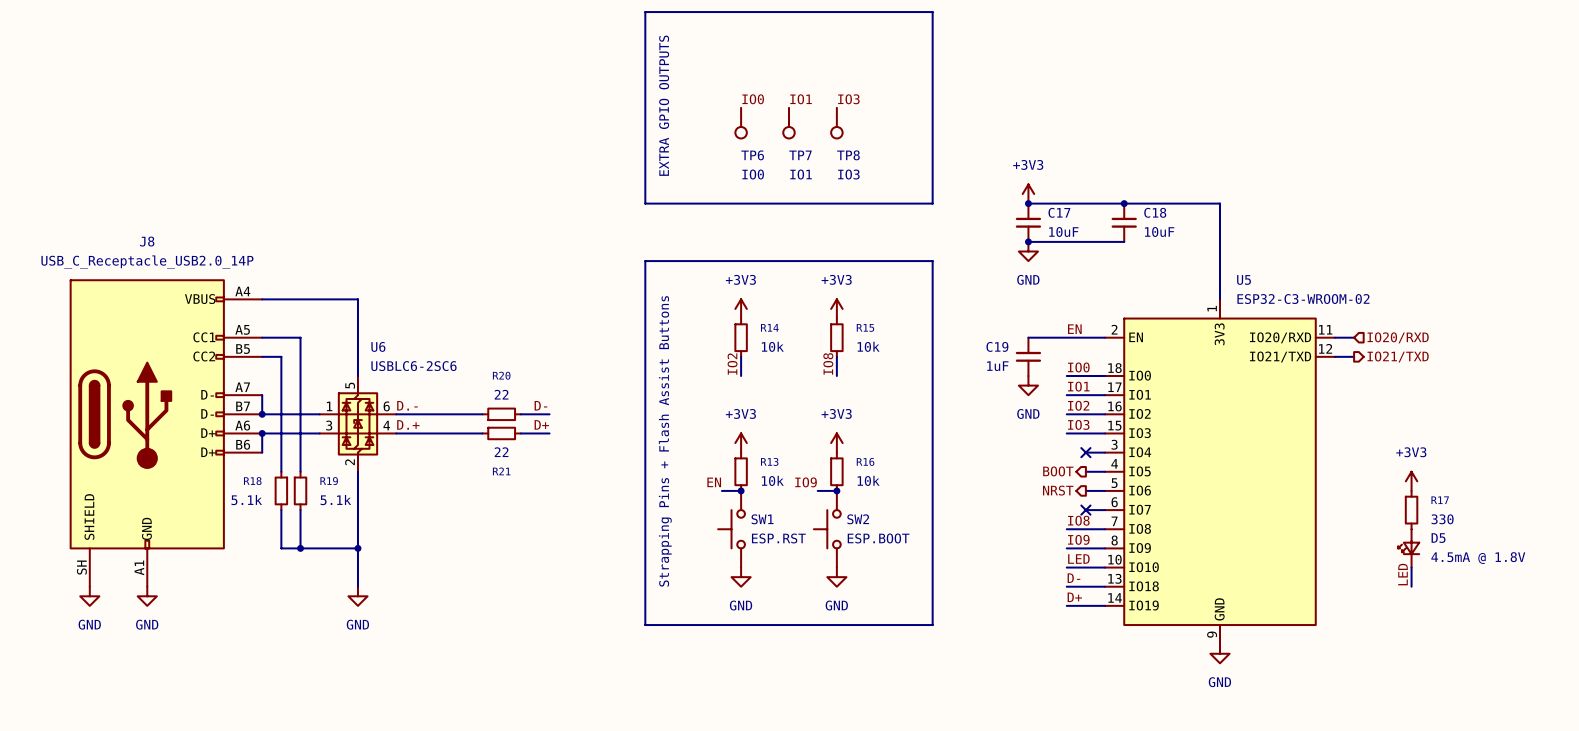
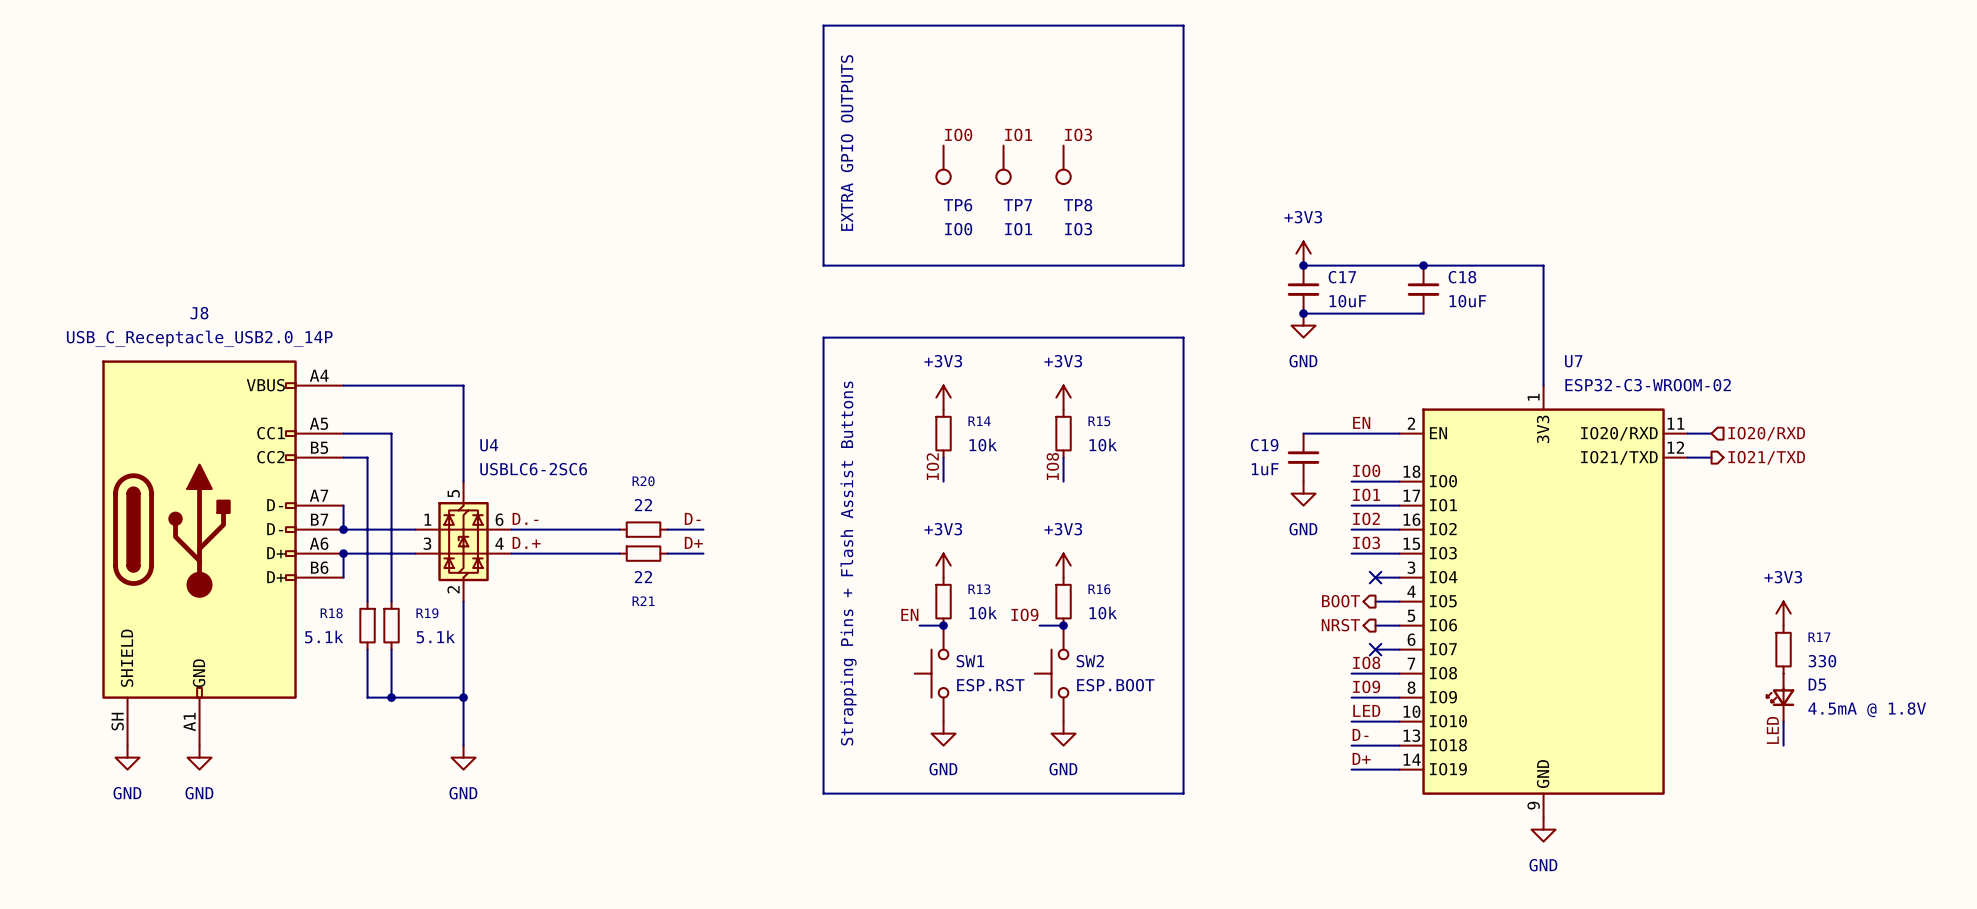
U5 name: U5 (1244, 279) -> U7 (1573, 361)
U6 name: U6 (378, 346) -> U4 (489, 445)

